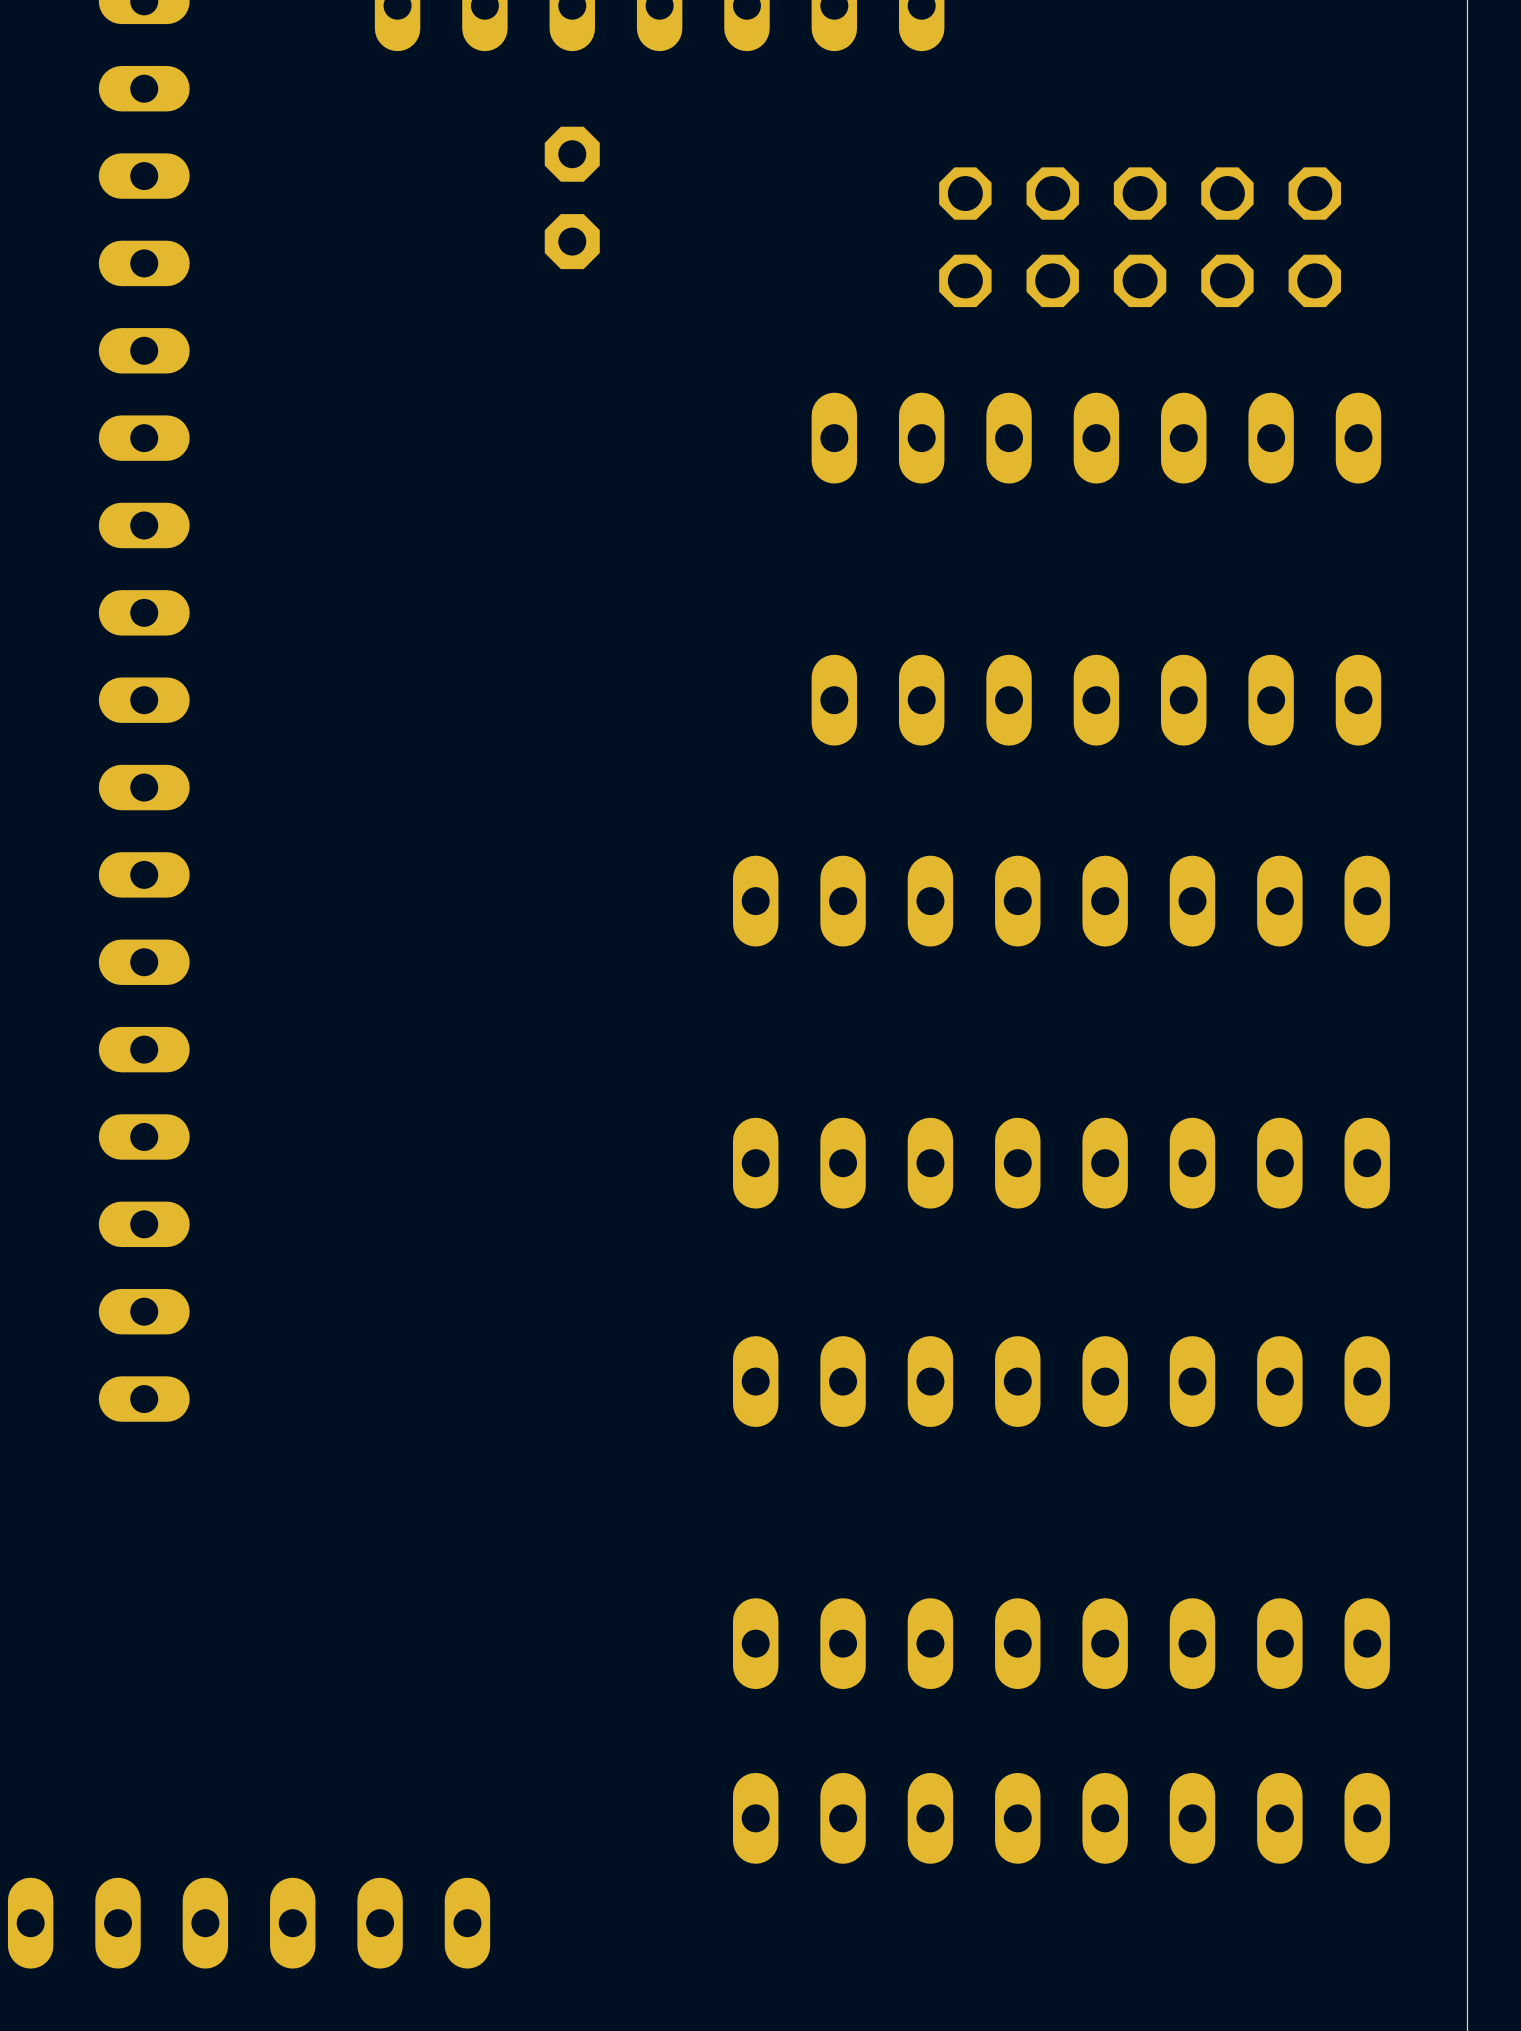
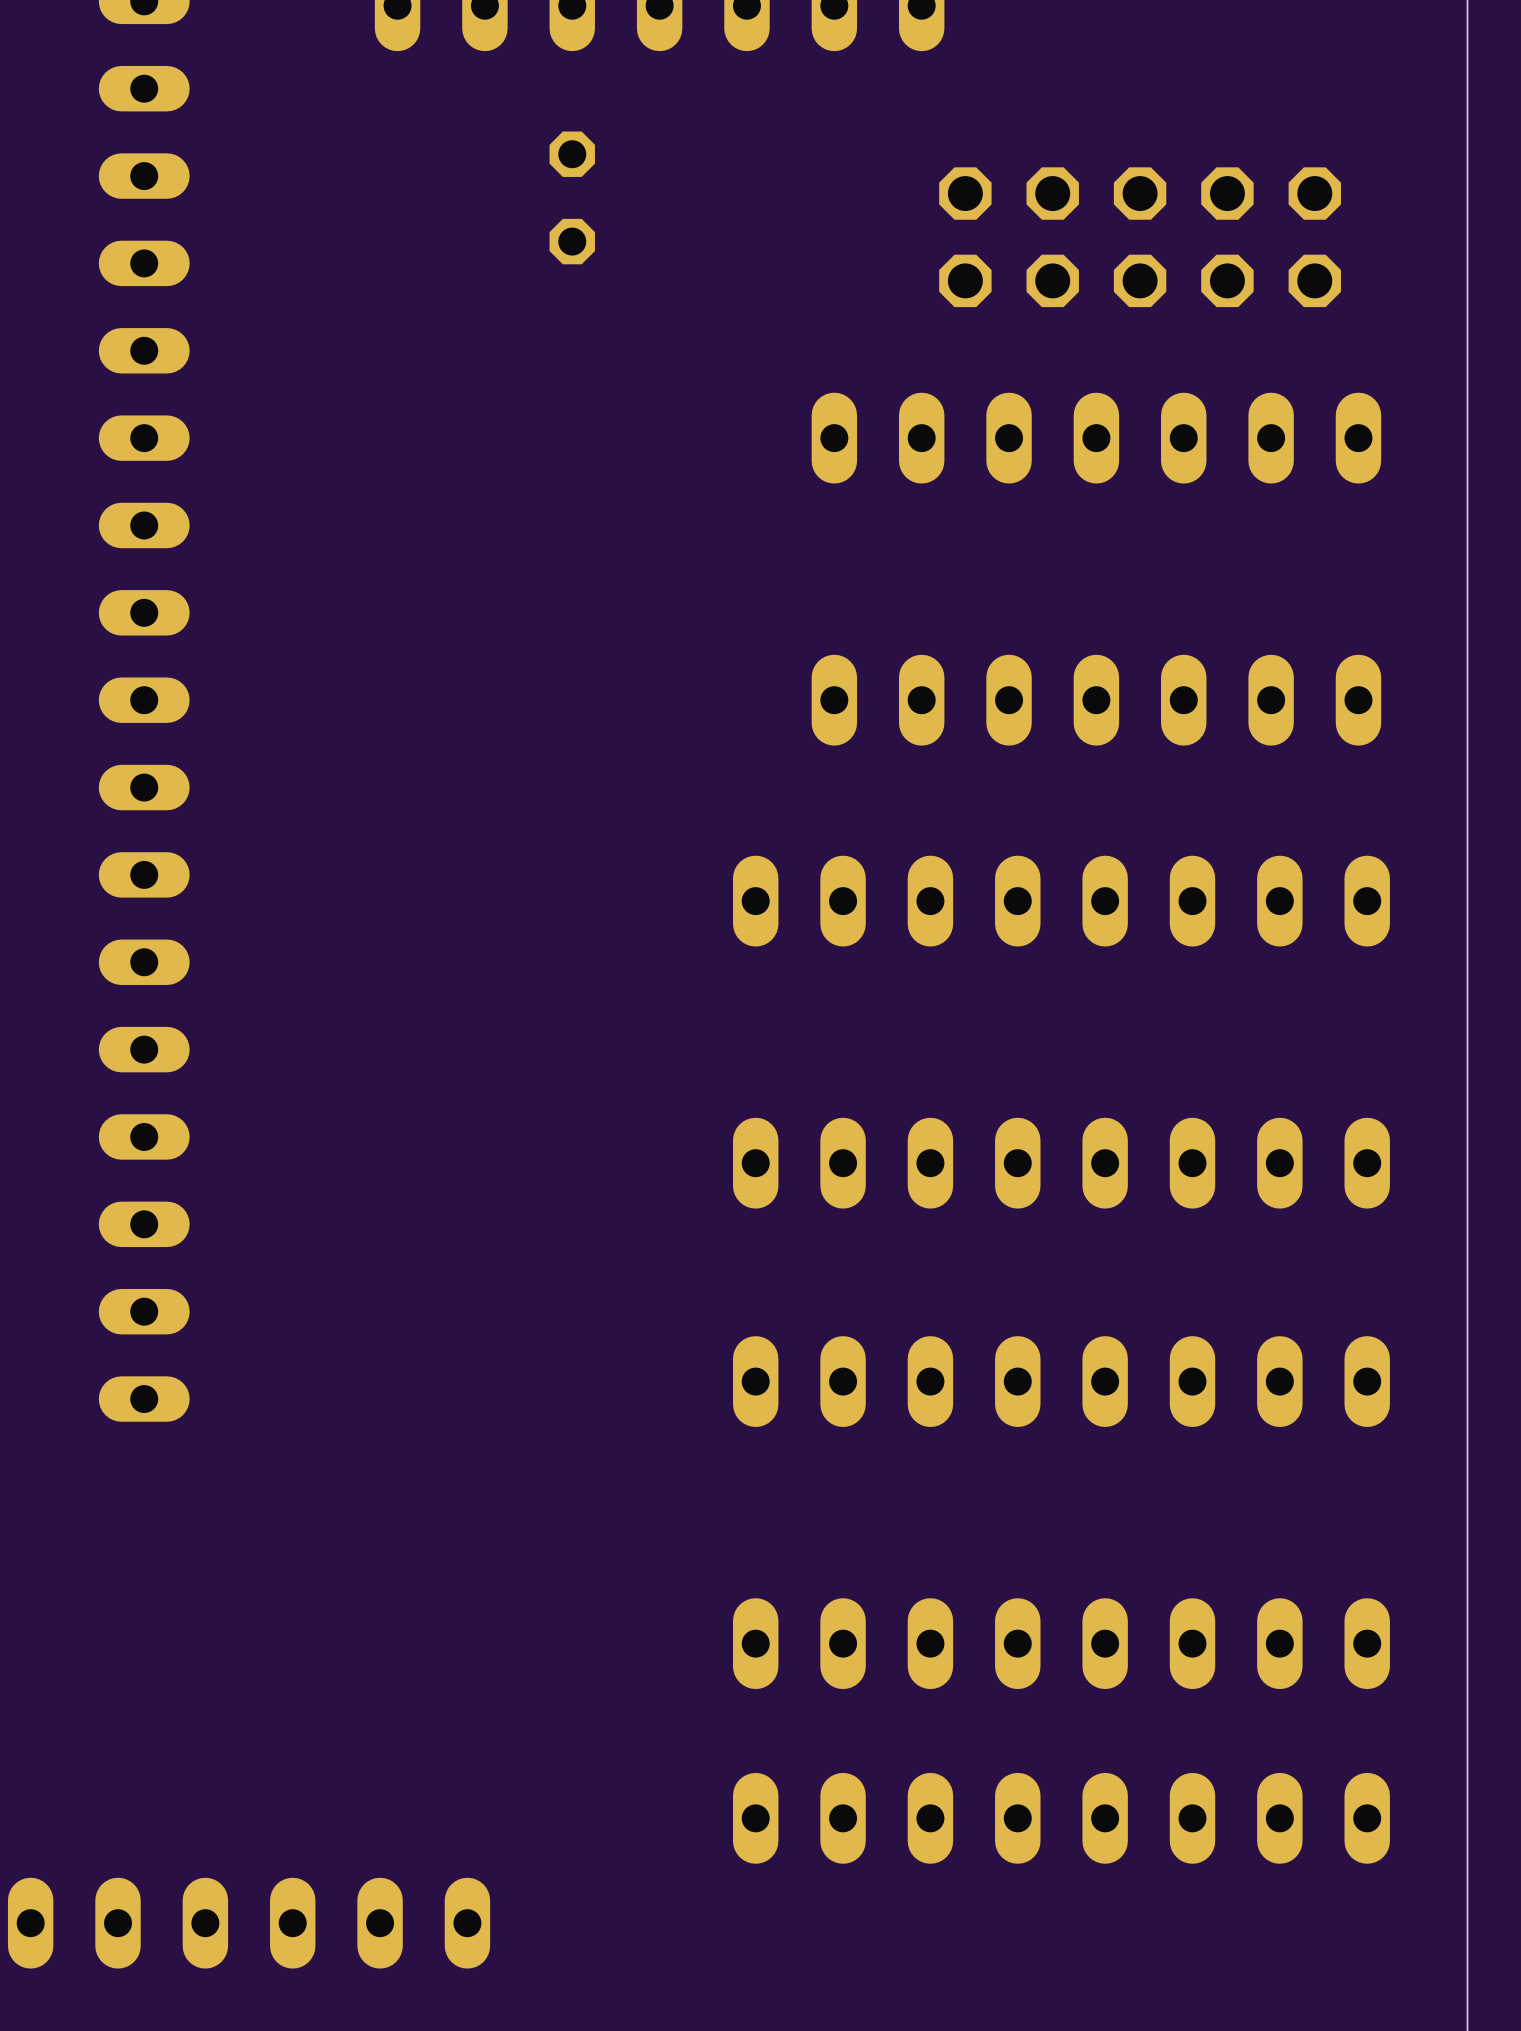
part footprint: [544, 126, 600, 270] -> [549, 131, 595, 265]

